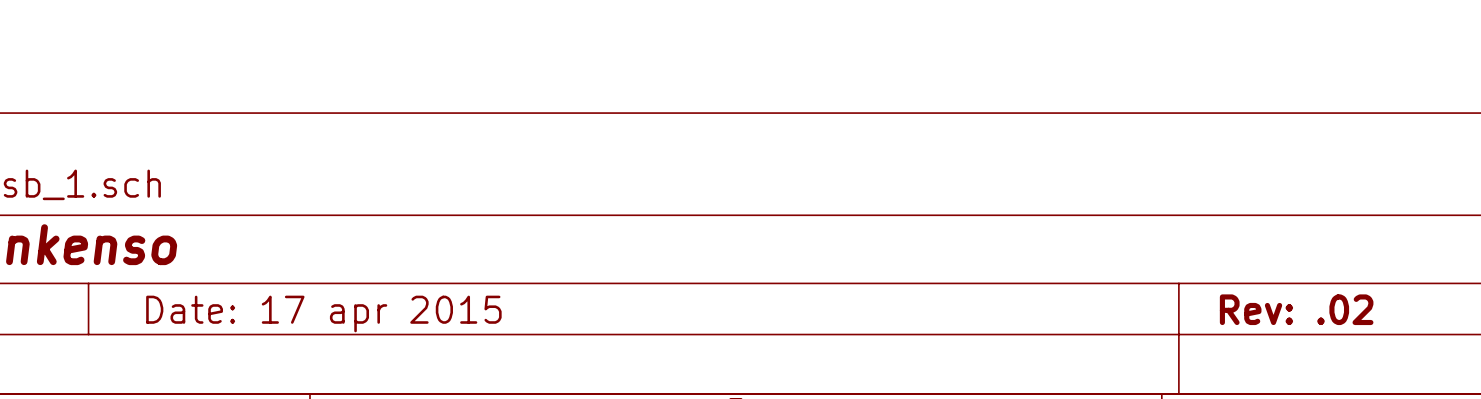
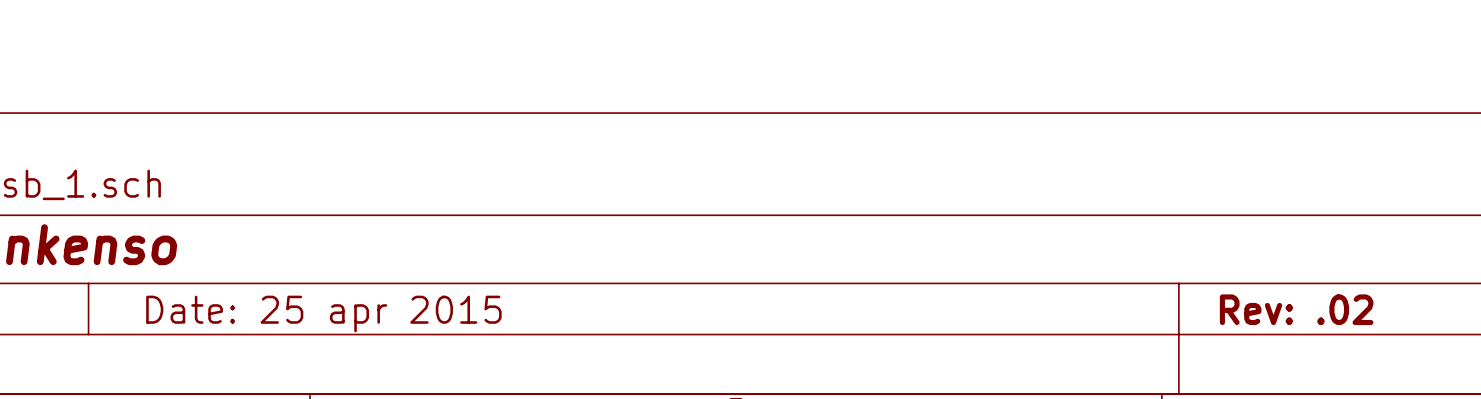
title block: Date: 17 apr 2015 (323, 313) -> Date: 25 apr 2015 (323, 313)

